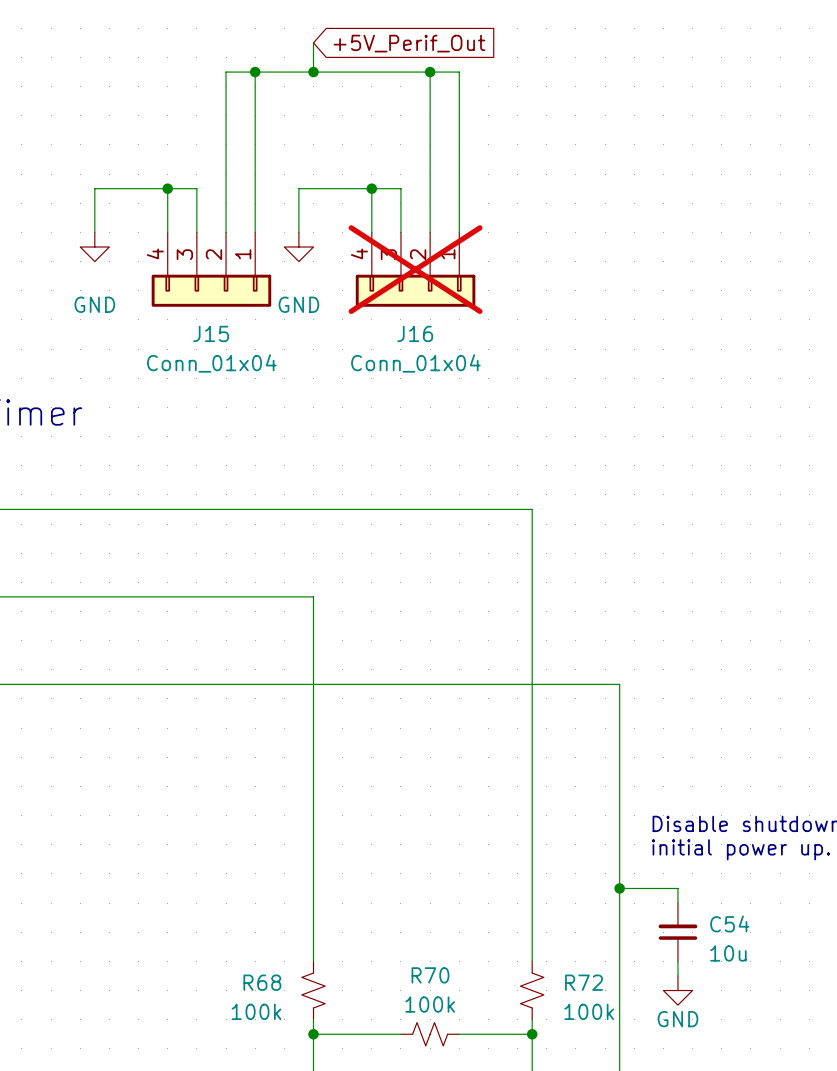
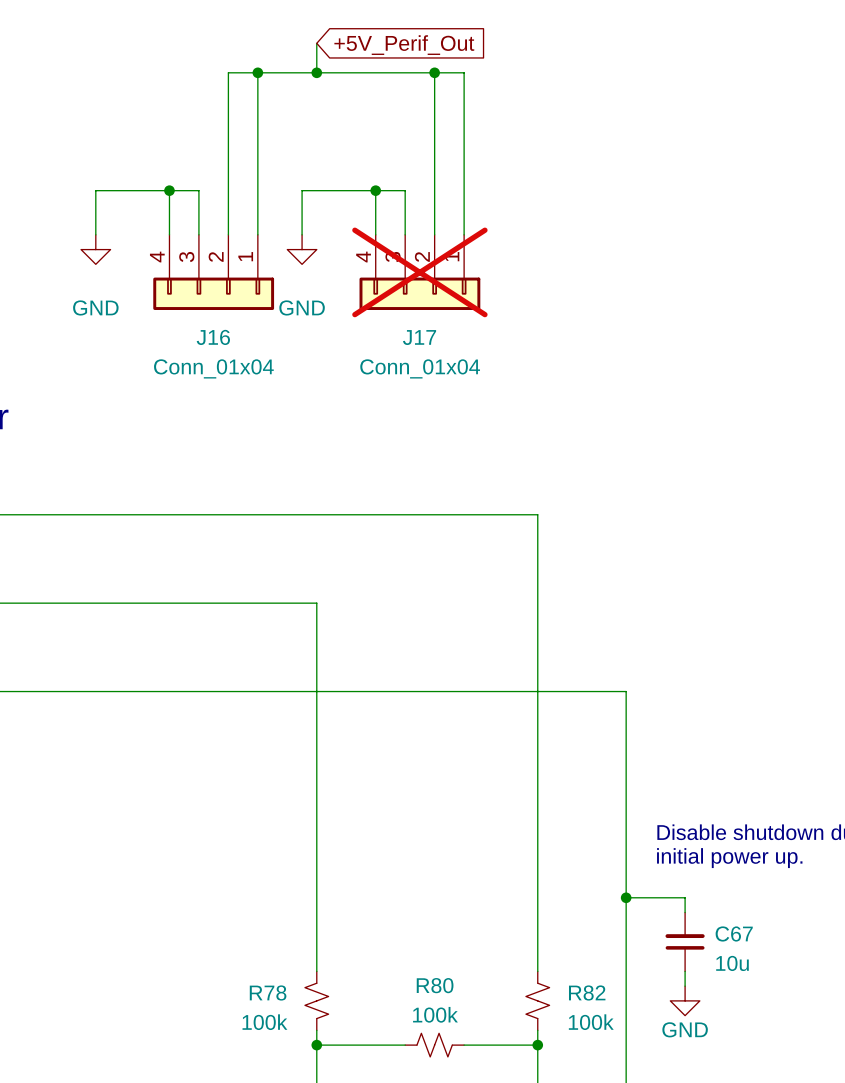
J15 name: J15 (211, 333) -> J16 (213, 337)
J16 name: J16 (415, 333) -> J17 (419, 337)
C54 name: C54 (729, 923) -> C67 (734, 933)
R70 name: R70 (430, 975) -> R80 (435, 985)
R68 name: R68 (262, 982) -> R78 (268, 992)
R72 name: R72 (584, 982) -> R82 (587, 992)

